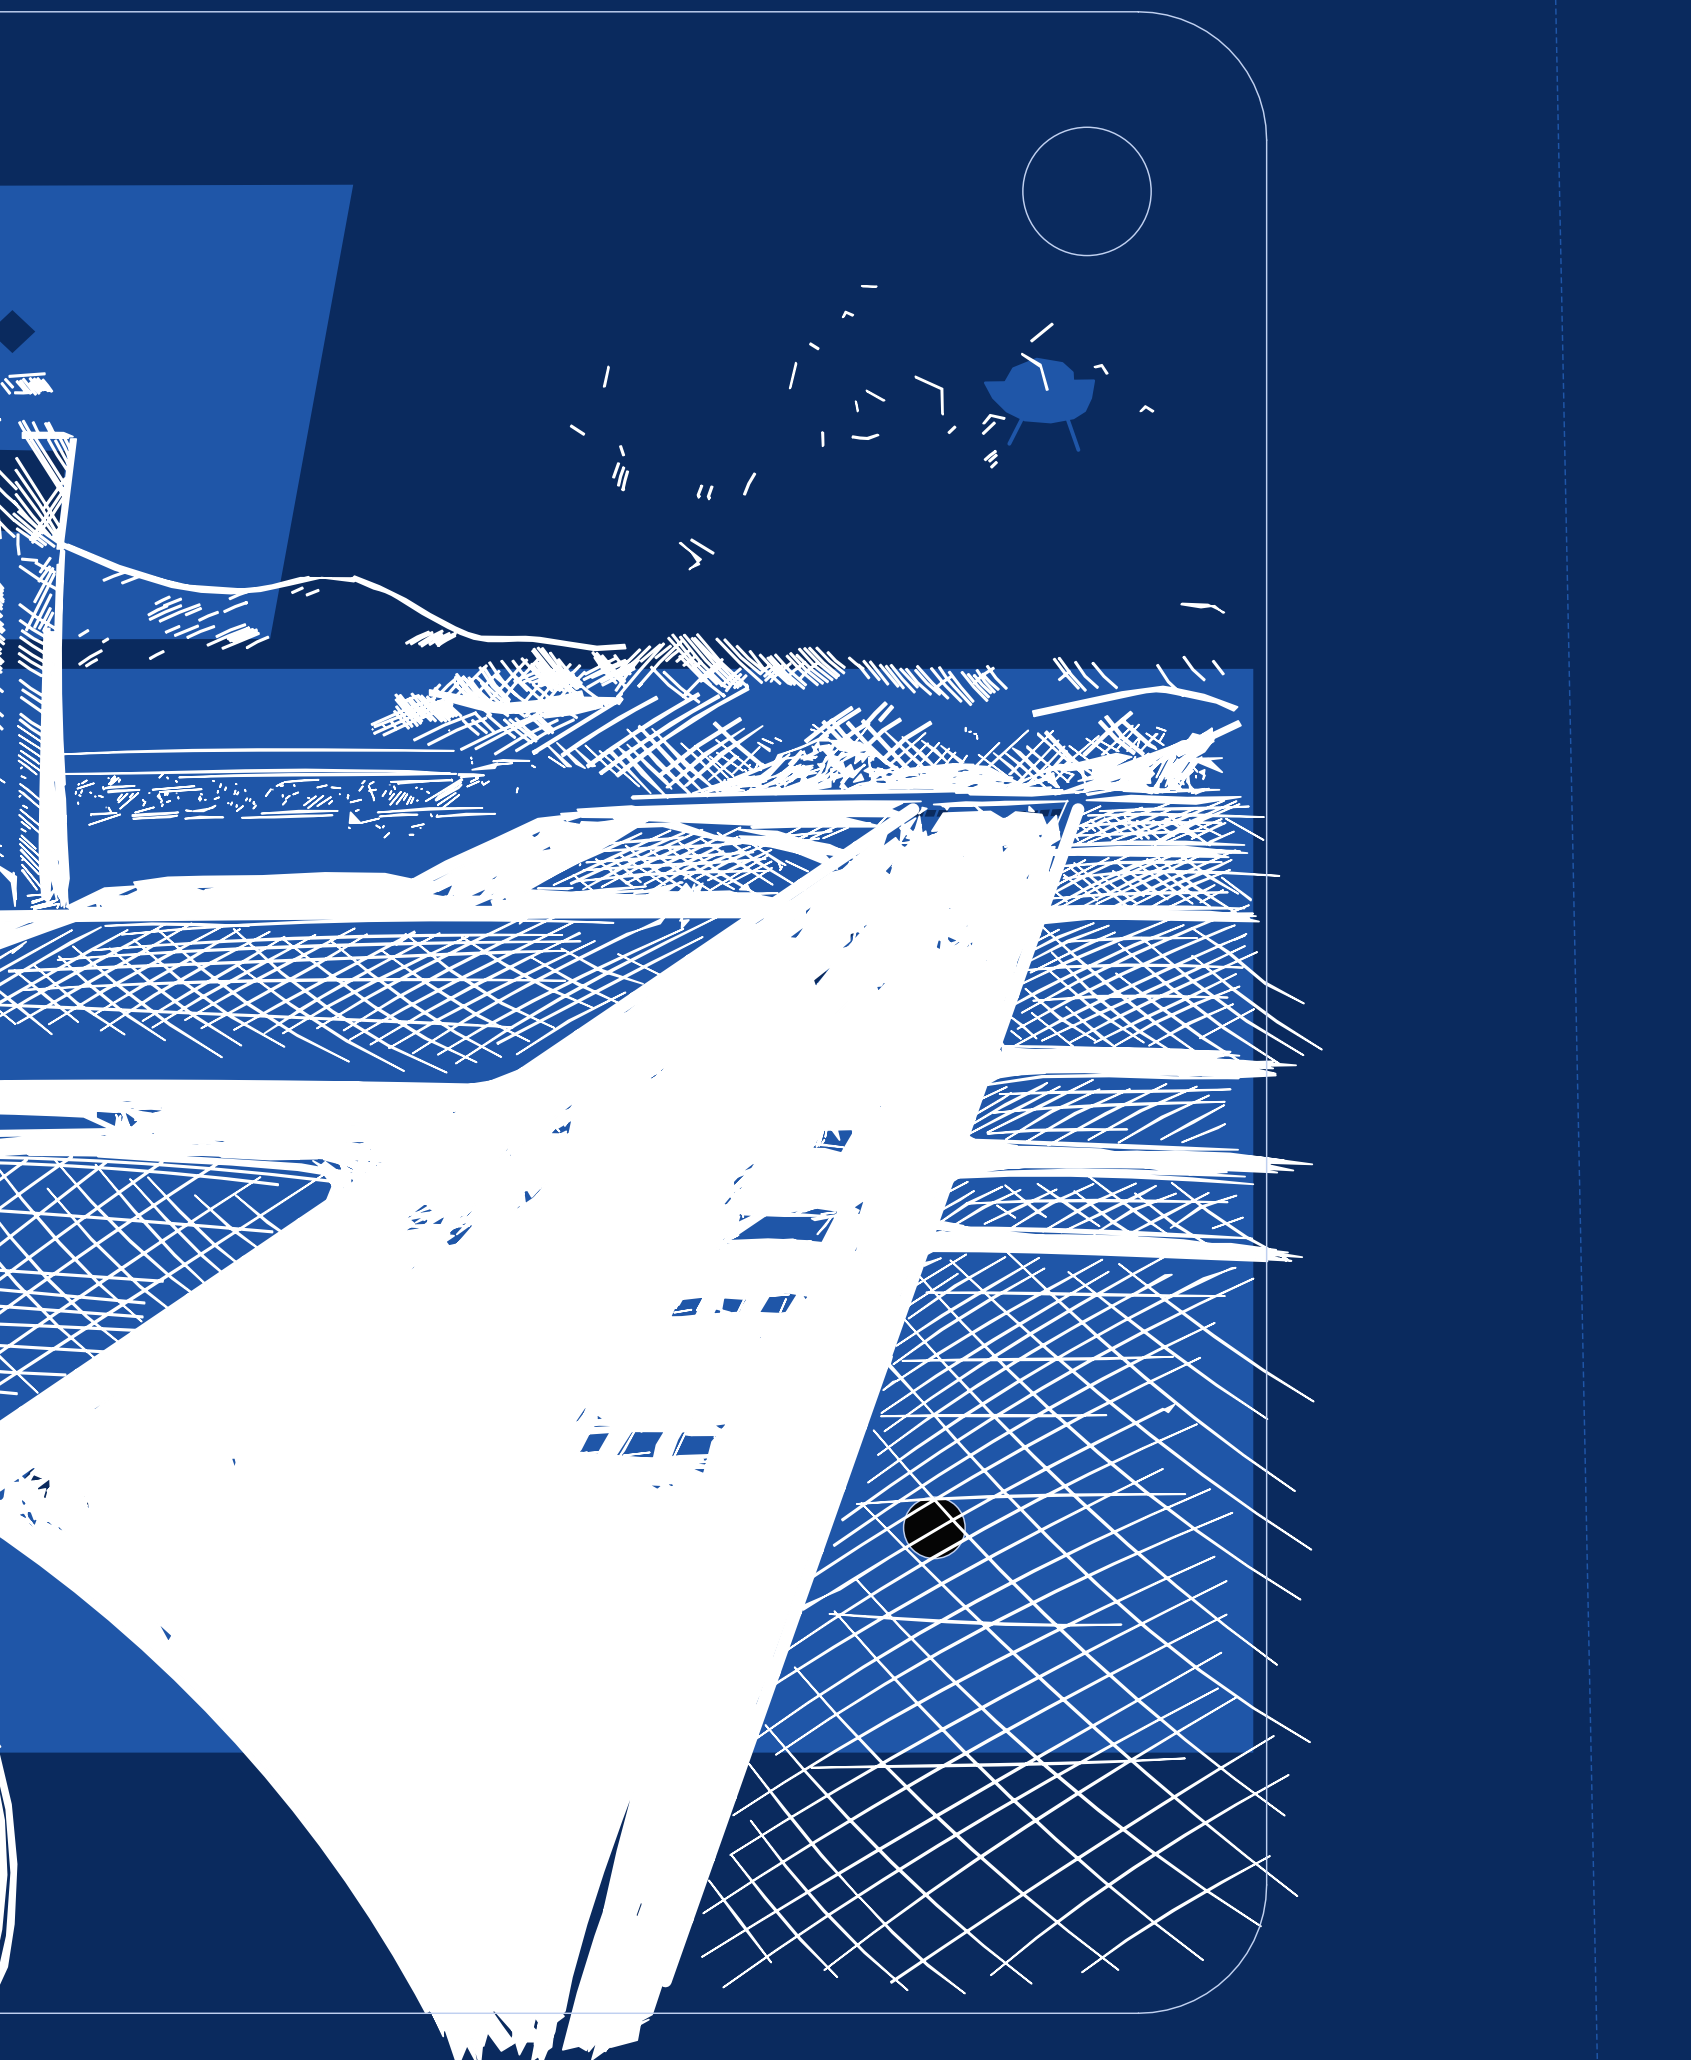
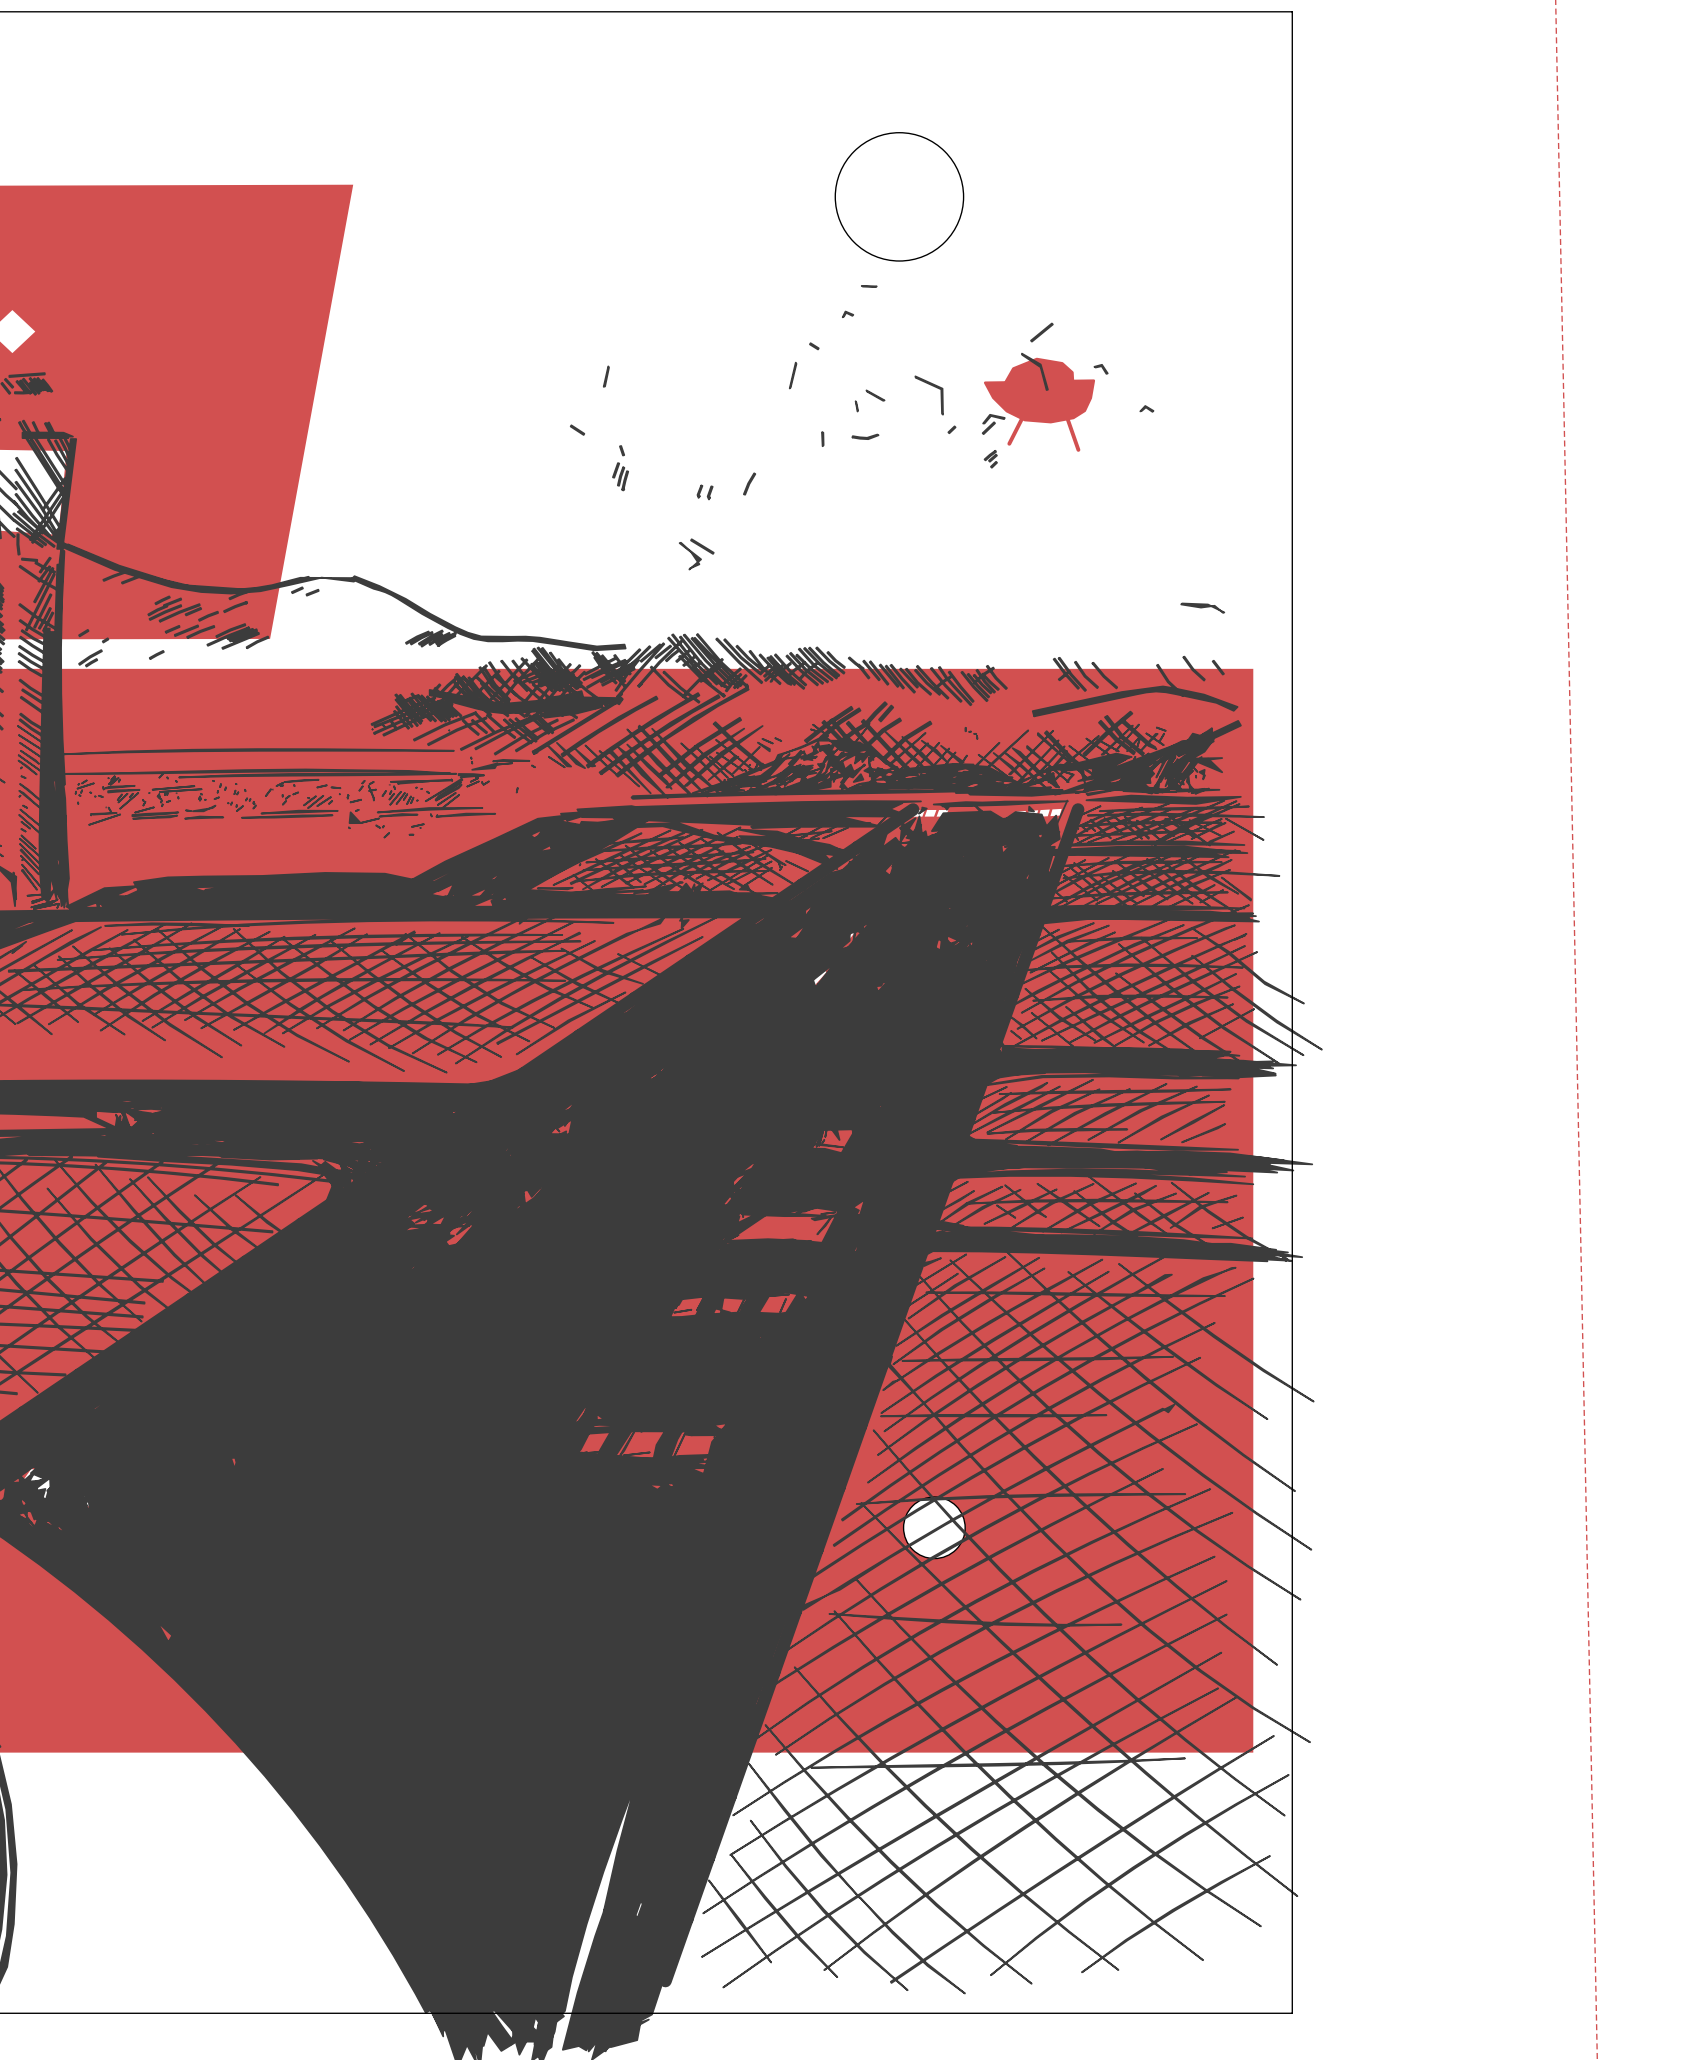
board edge: (1138, 11) (1152, 12) (1180, 18) (1206, 31) (1229, 49) (1246, 71) (1259, 97) (1265, 125) (1266, 140) (1265, 1899) (1259, 1927) (1253, 1940) (1246, 1953) (1229, 1975) (1206, 1993) (1180, 2006) (1152, 2012) (1138, 2013) -> (1138, 11) (1292, 11) (1292, 2013) (1138, 2013)
round board edge position: (1087, 191) -> (899, 196)

